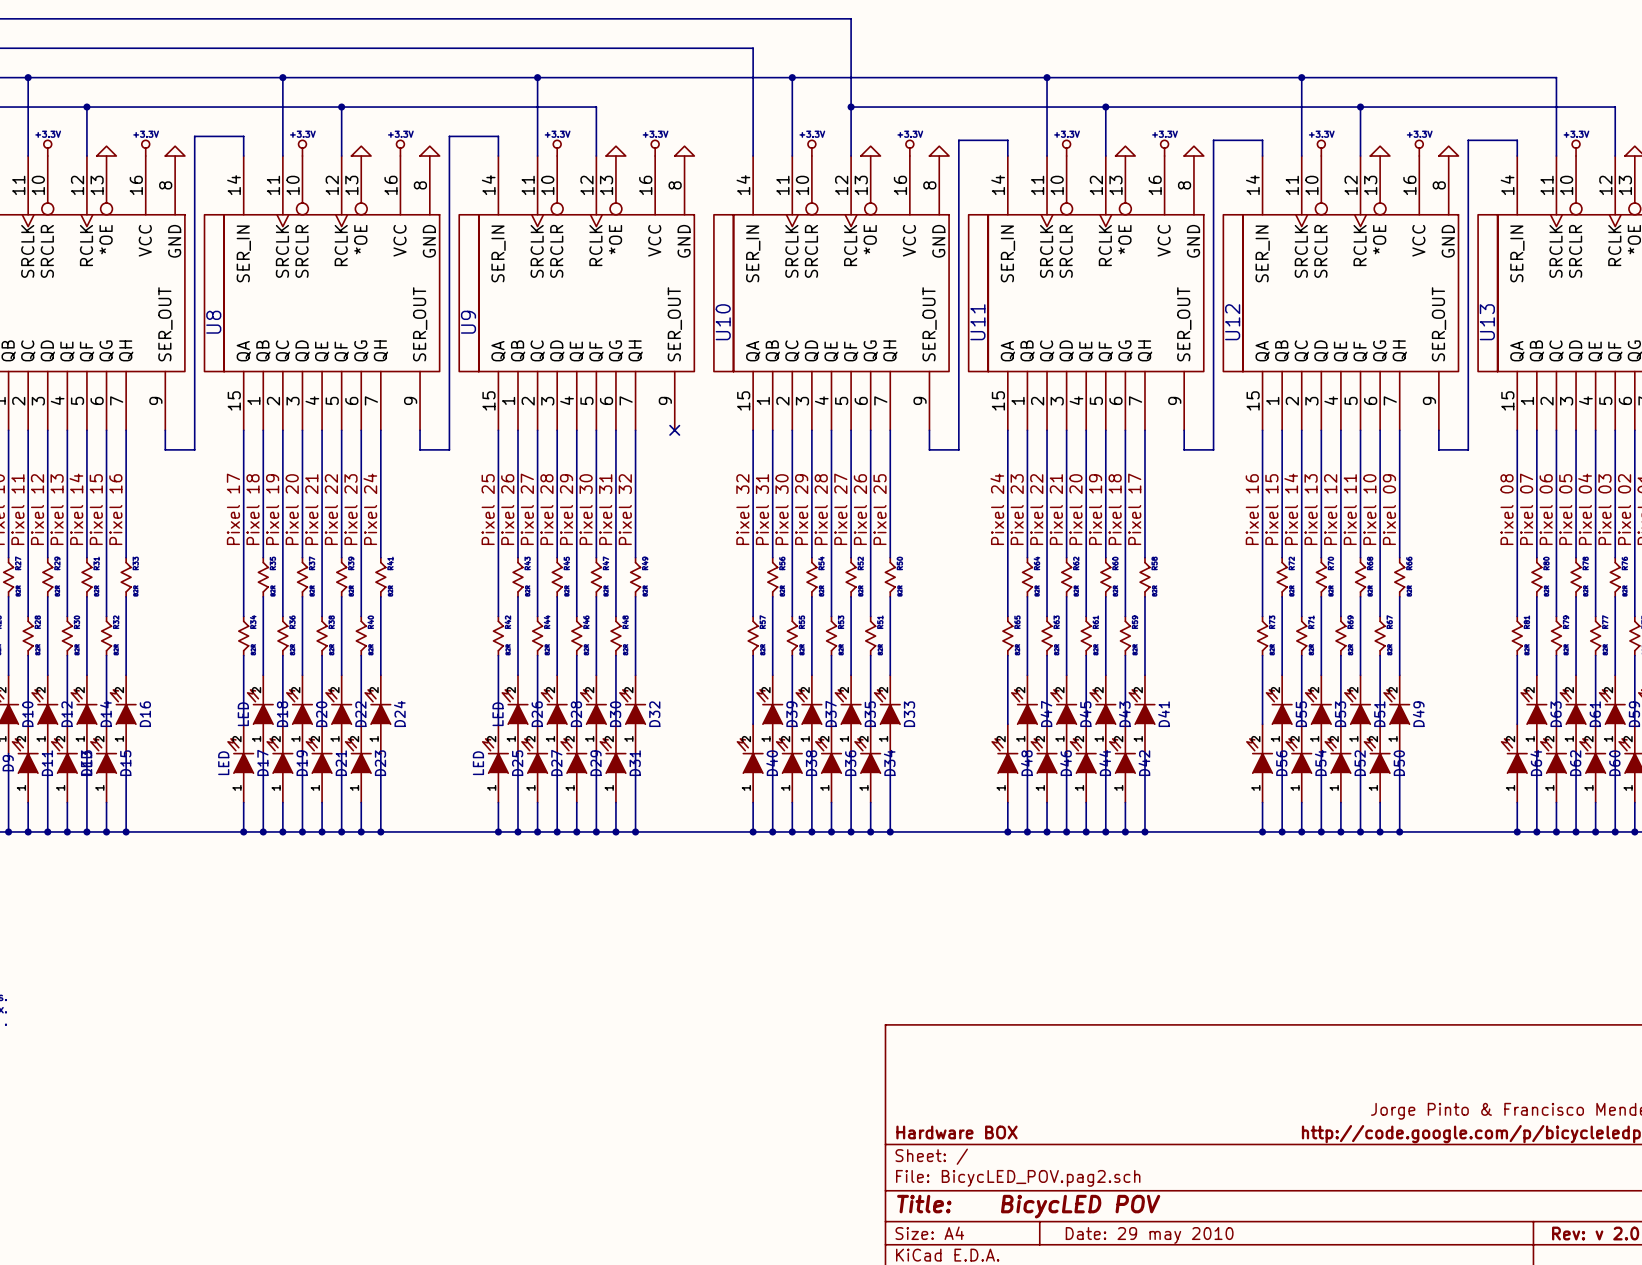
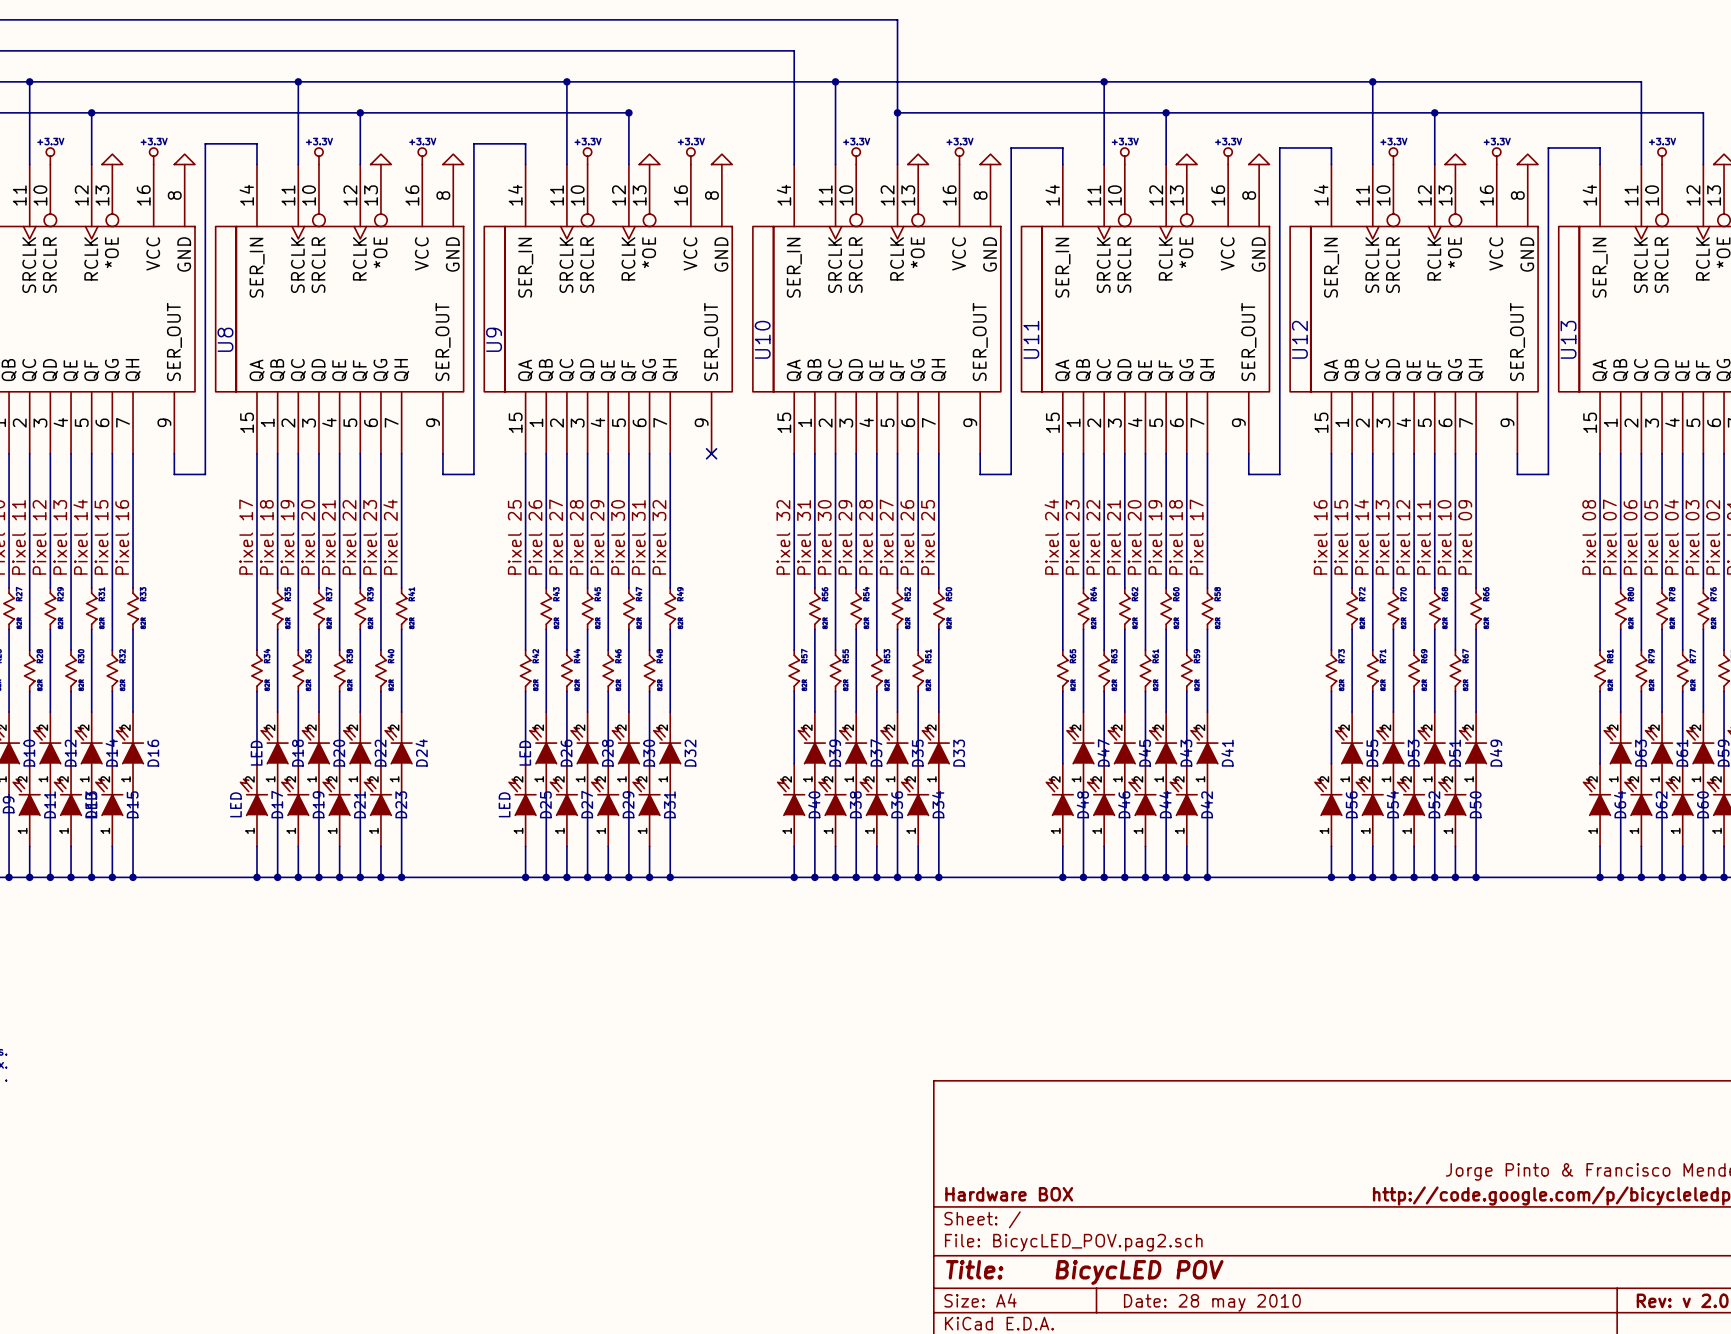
junction: none -> (628, 112)
title block: Date: 29 may 2010 (1149, 1235) -> Date: 28 may 2010 (1212, 1302)

